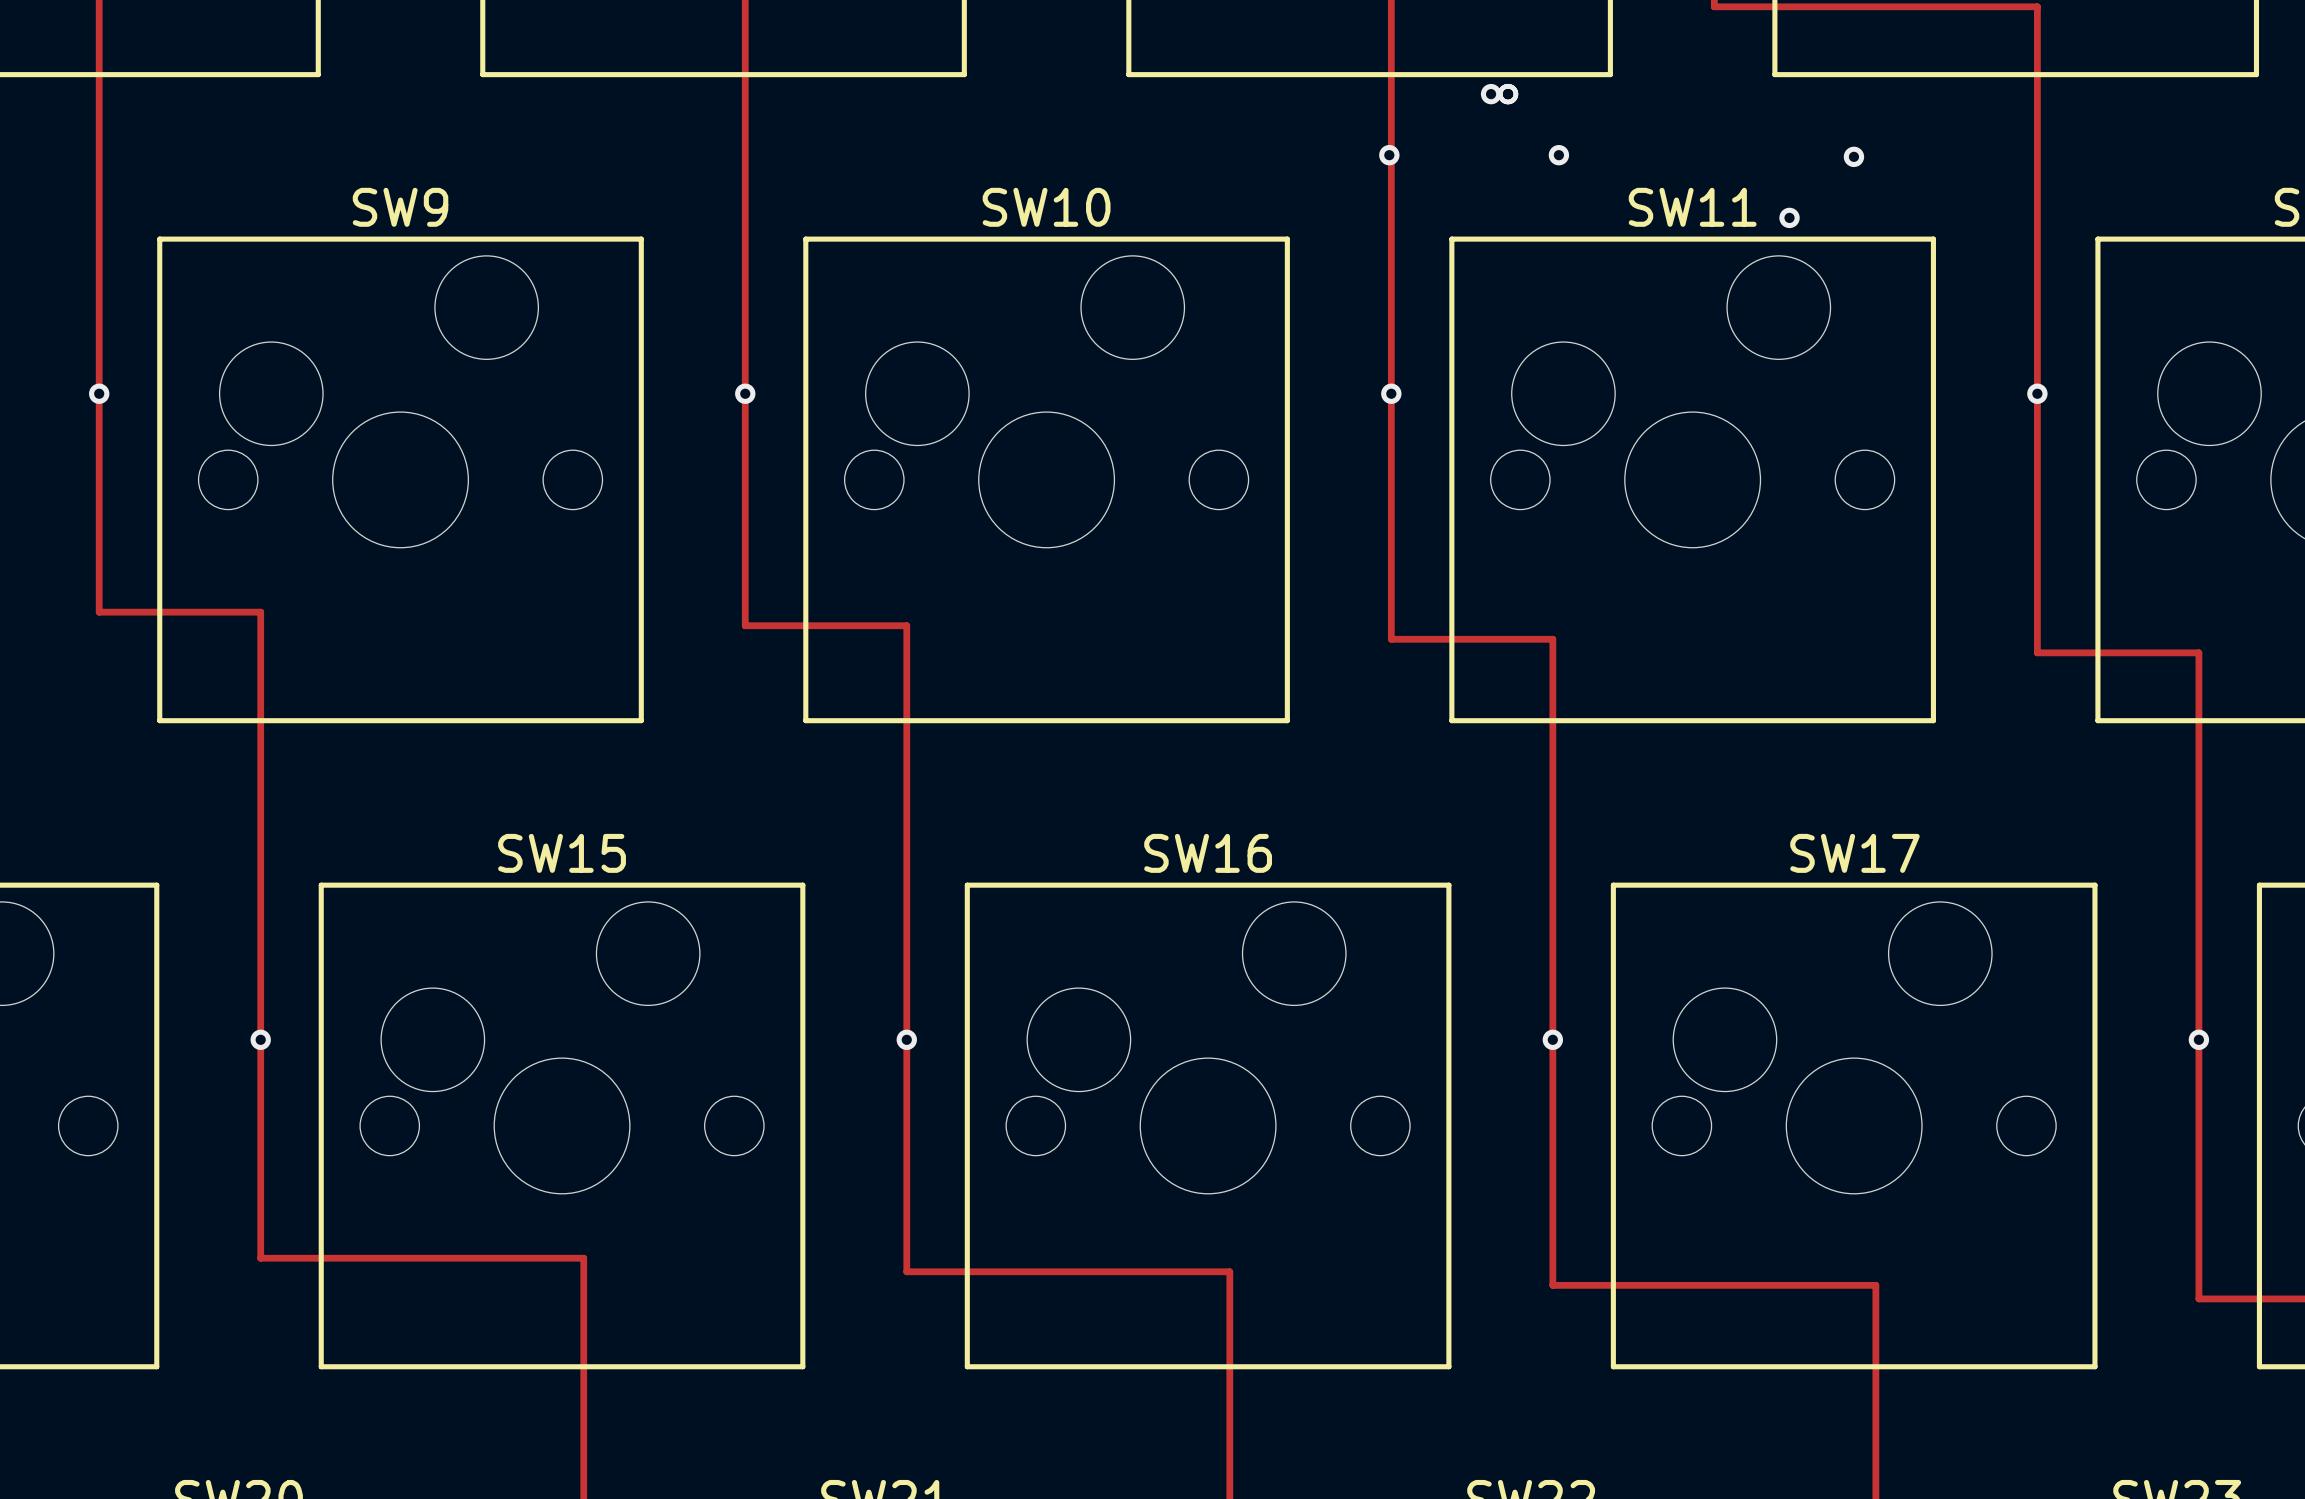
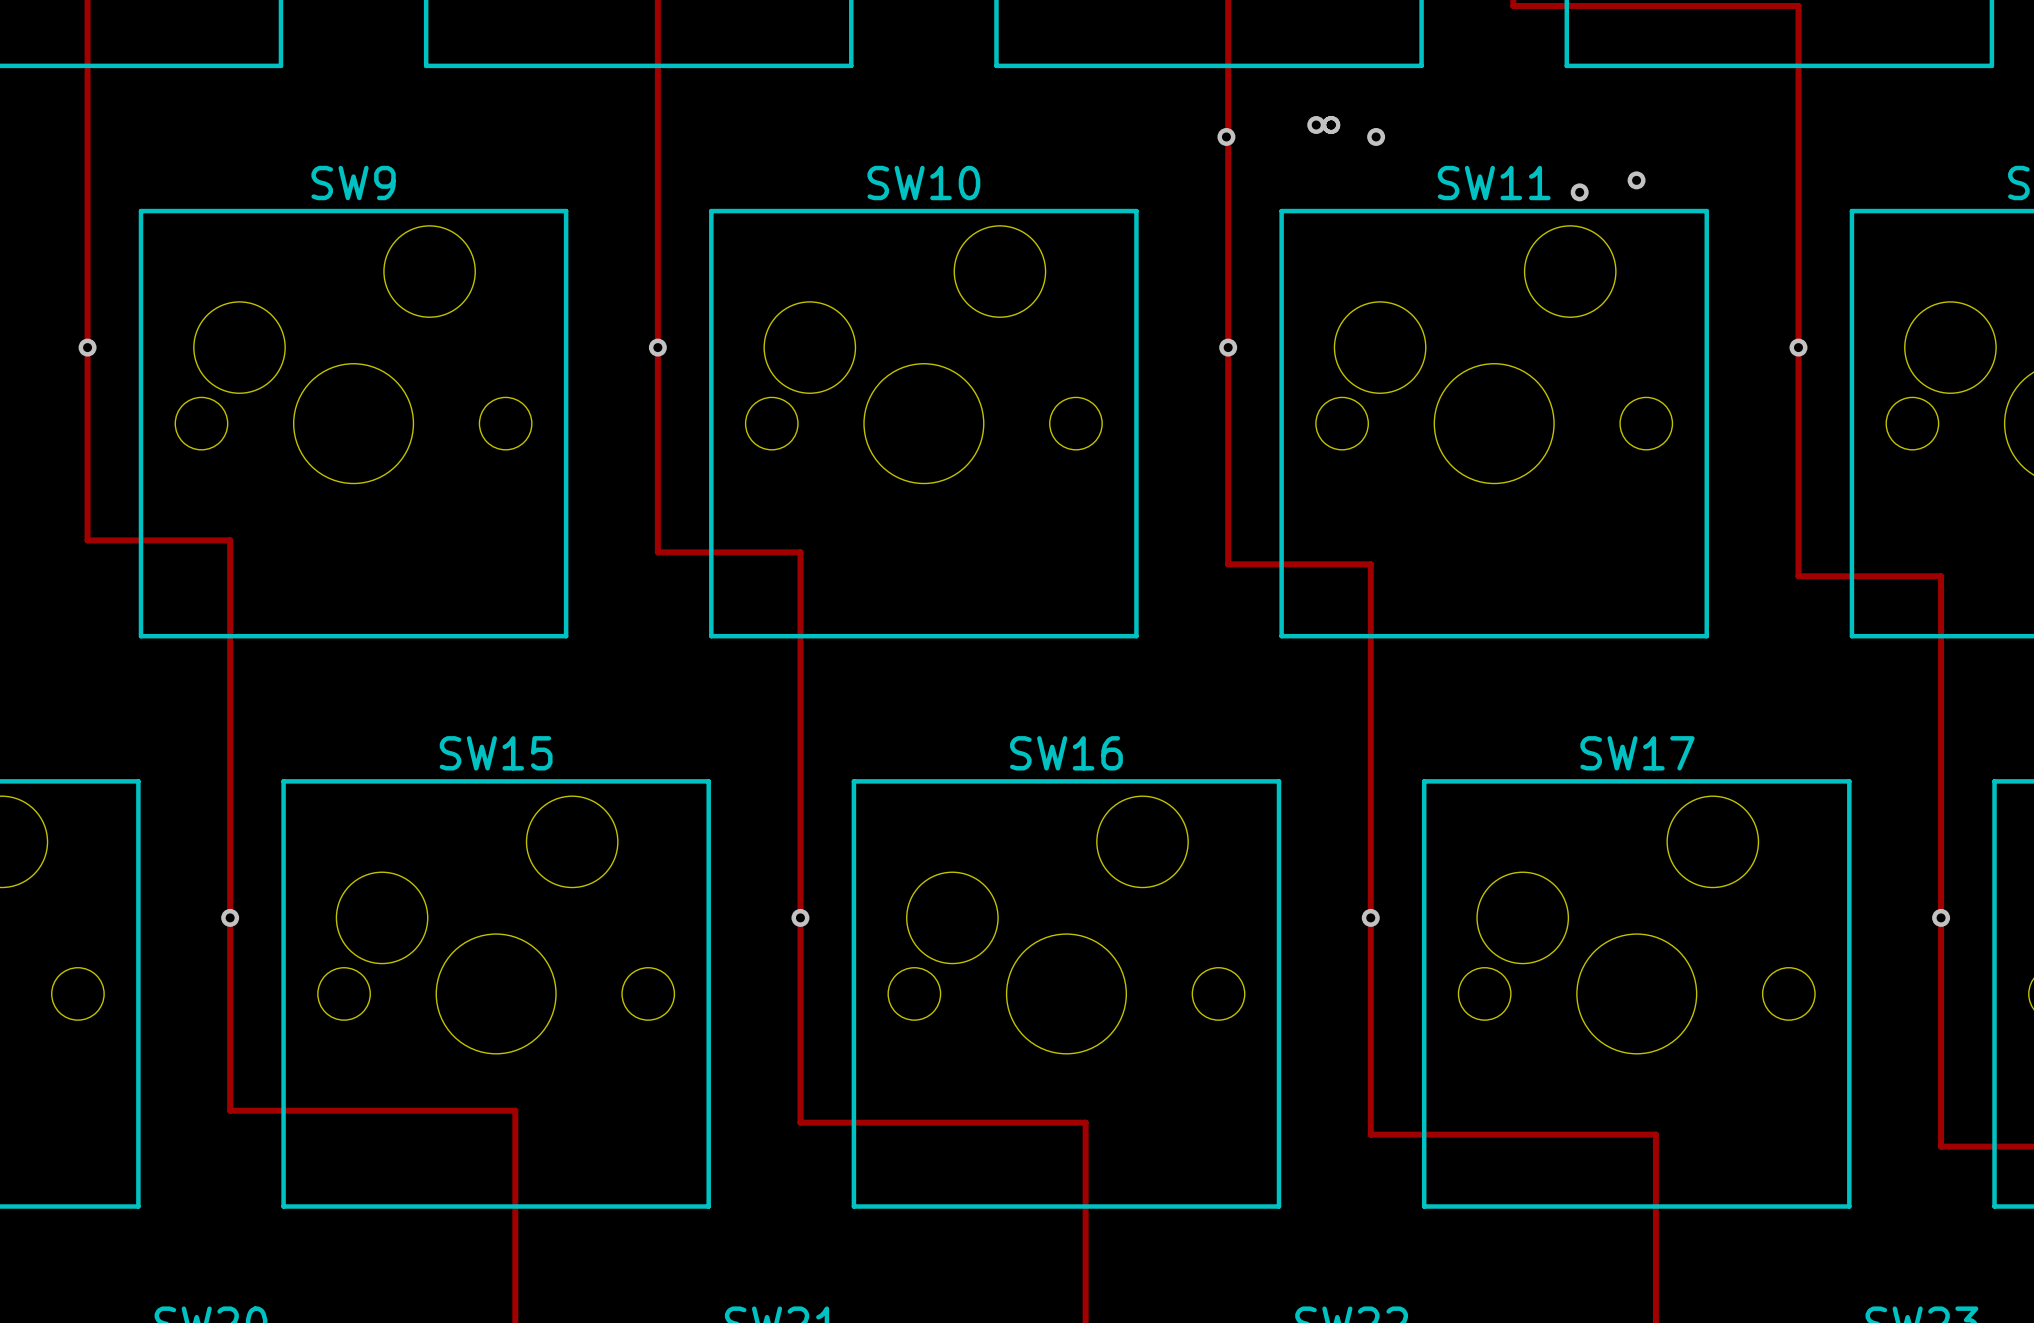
via: (1491, 94) -> none
via: (1508, 94) -> none
via: none -> (1316, 125)
via: none -> (1331, 125)
via position: (1853, 156) -> (1636, 180)

